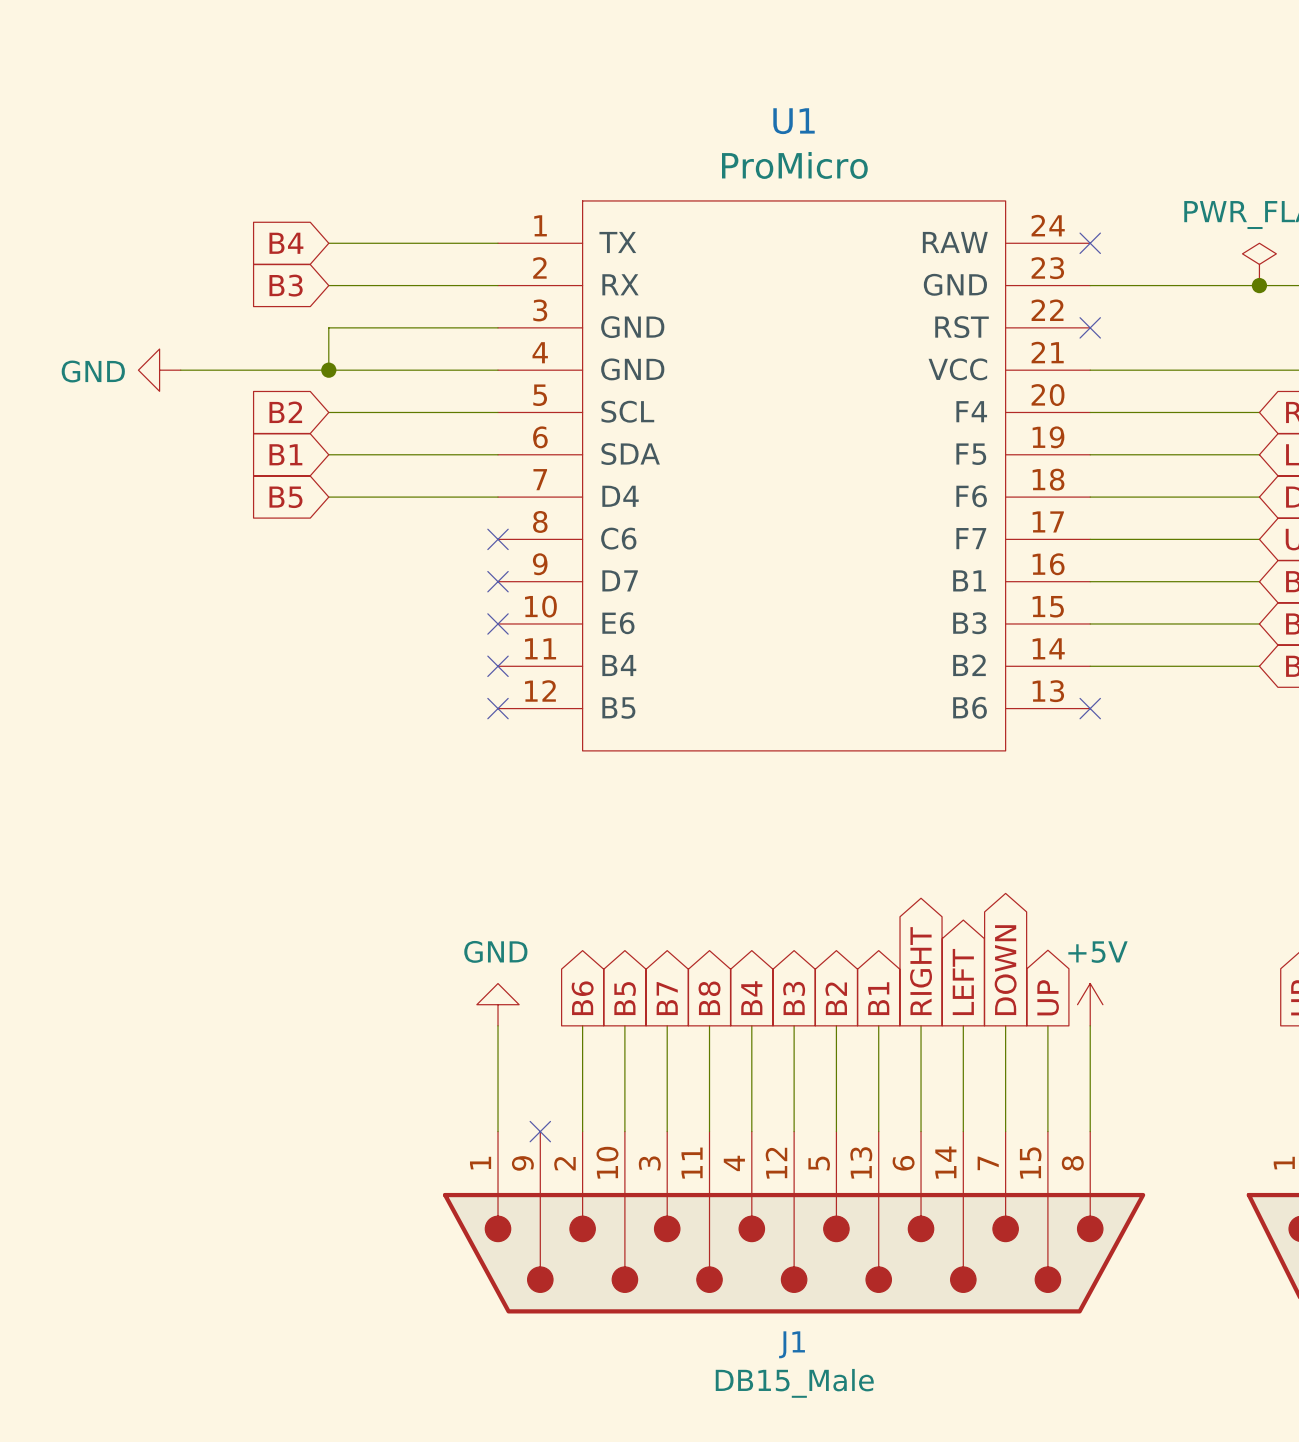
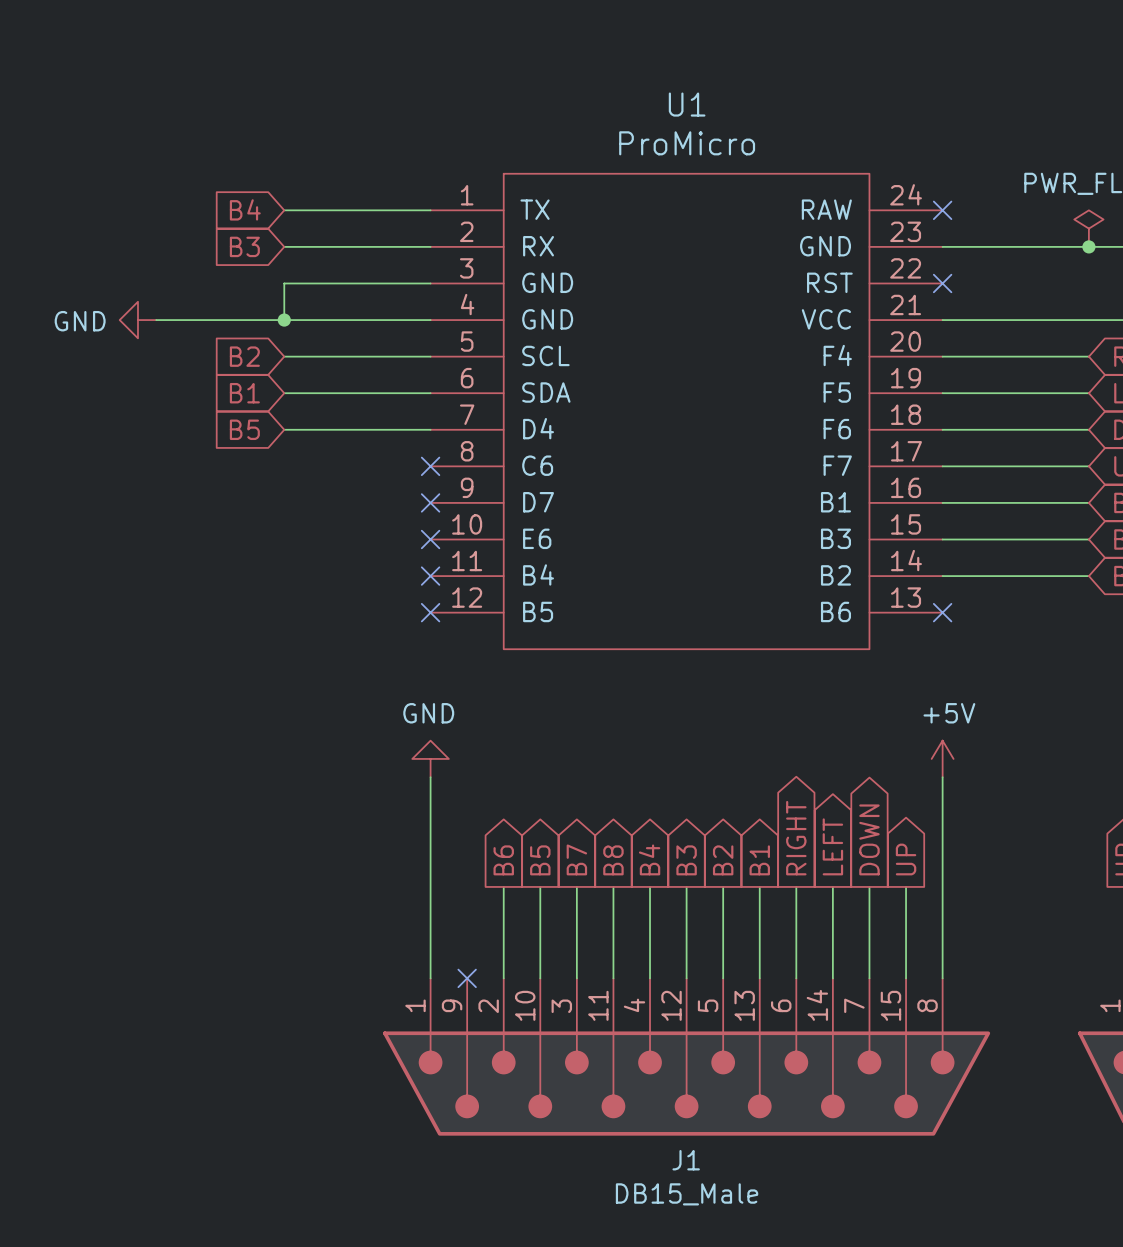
wire: none -> (430, 777) (430, 886)
wire: none -> (942, 777) (942, 886)
power symbol position: GND (498, 1004) -> GND (430, 758)
power symbol position: +5V (1090, 1004) -> +5V (942, 758)

